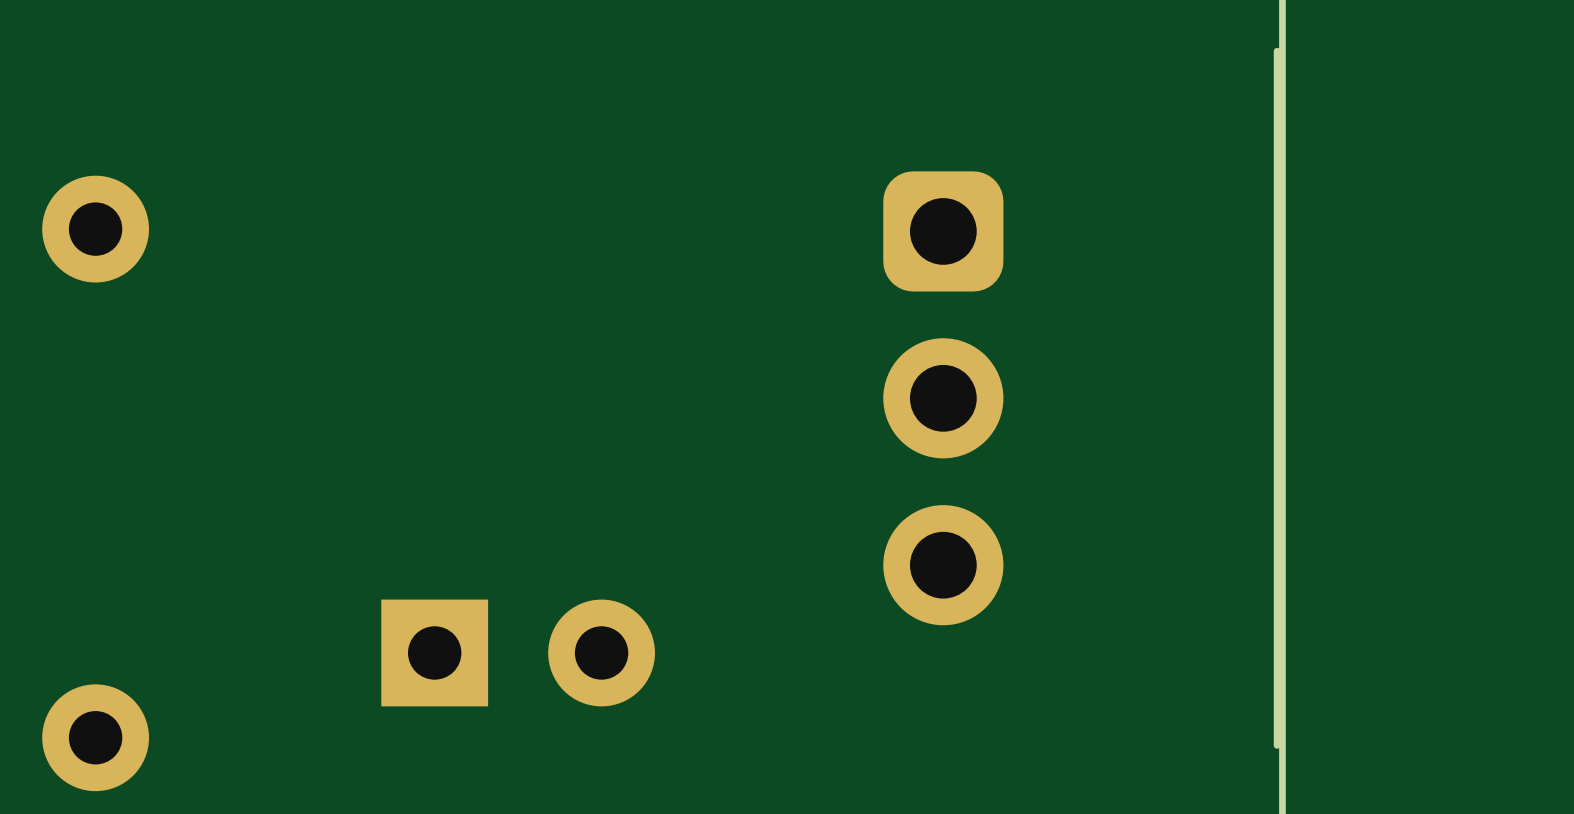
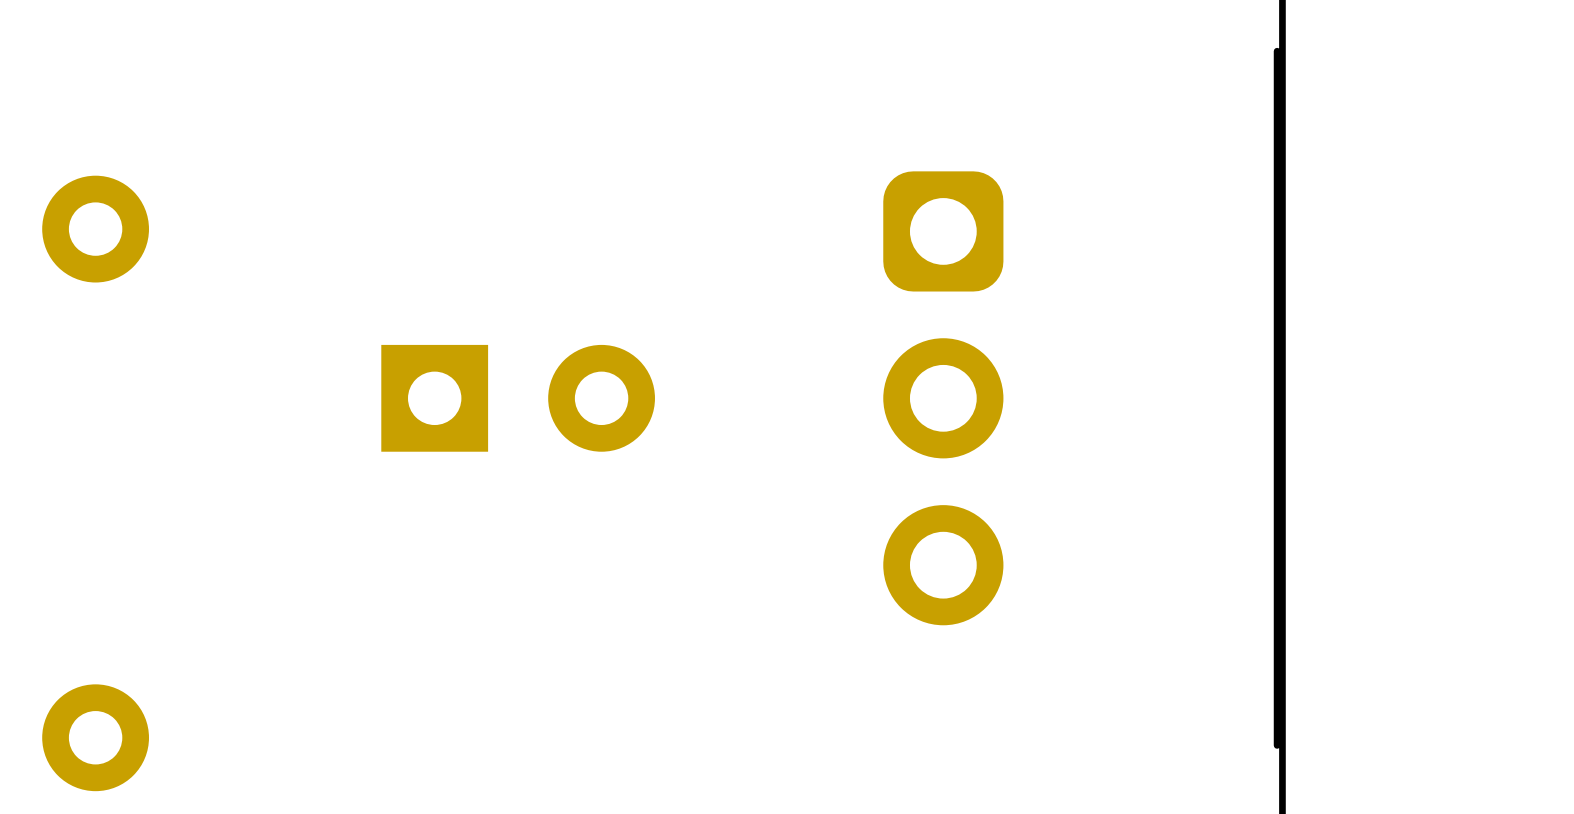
part position: (518, 652) -> (518, 398)

